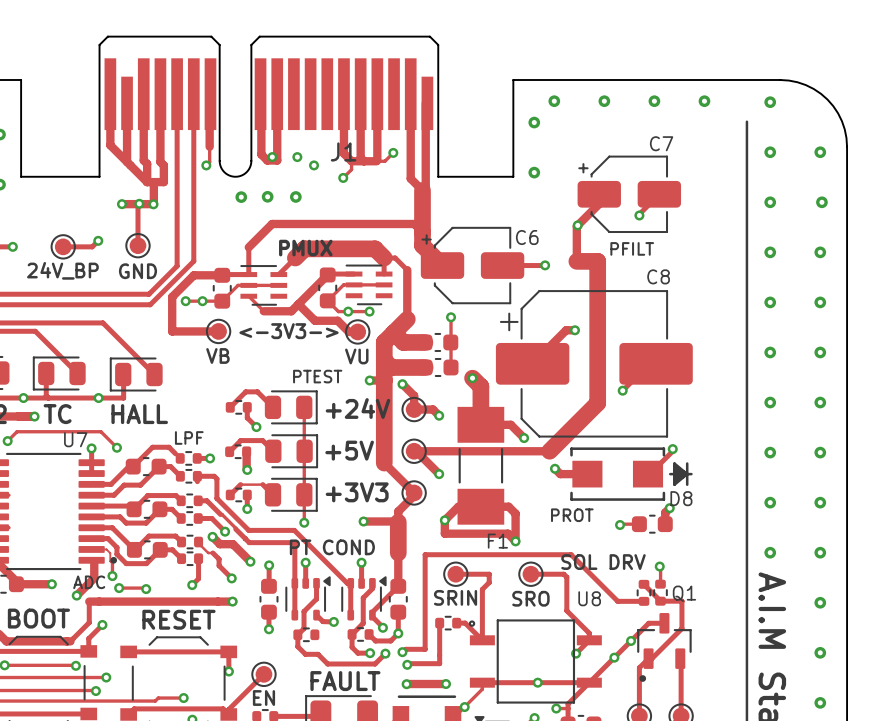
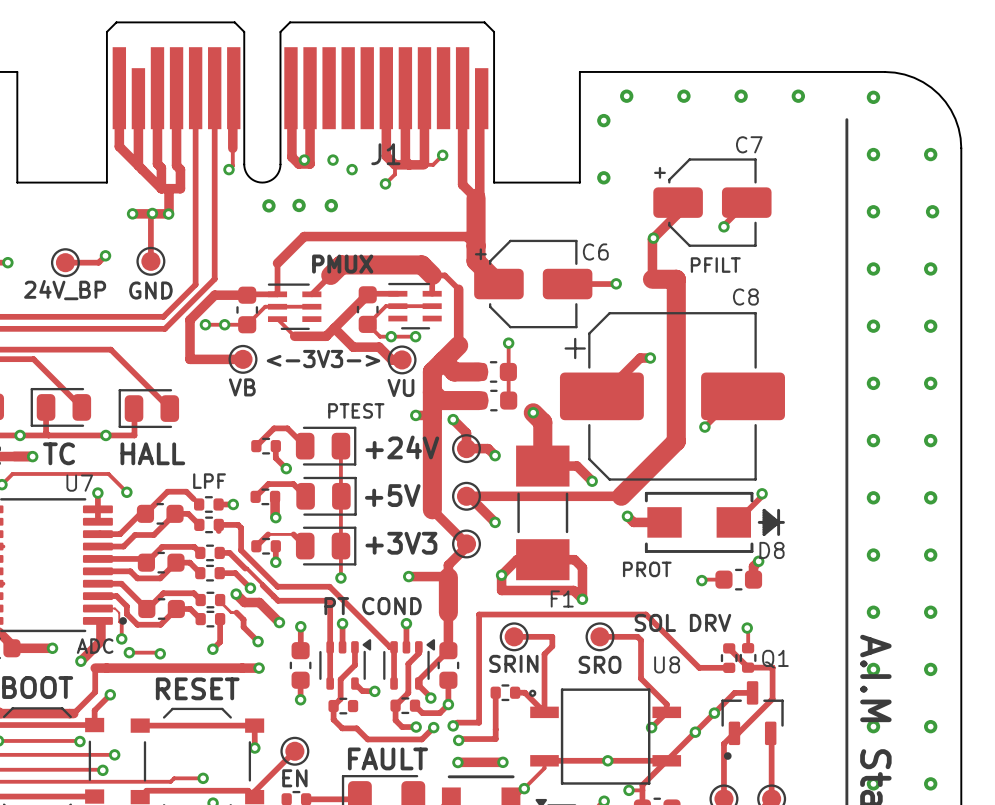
via: none -> (873, 669)
via: none -> (873, 726)
via: none -> (873, 783)

